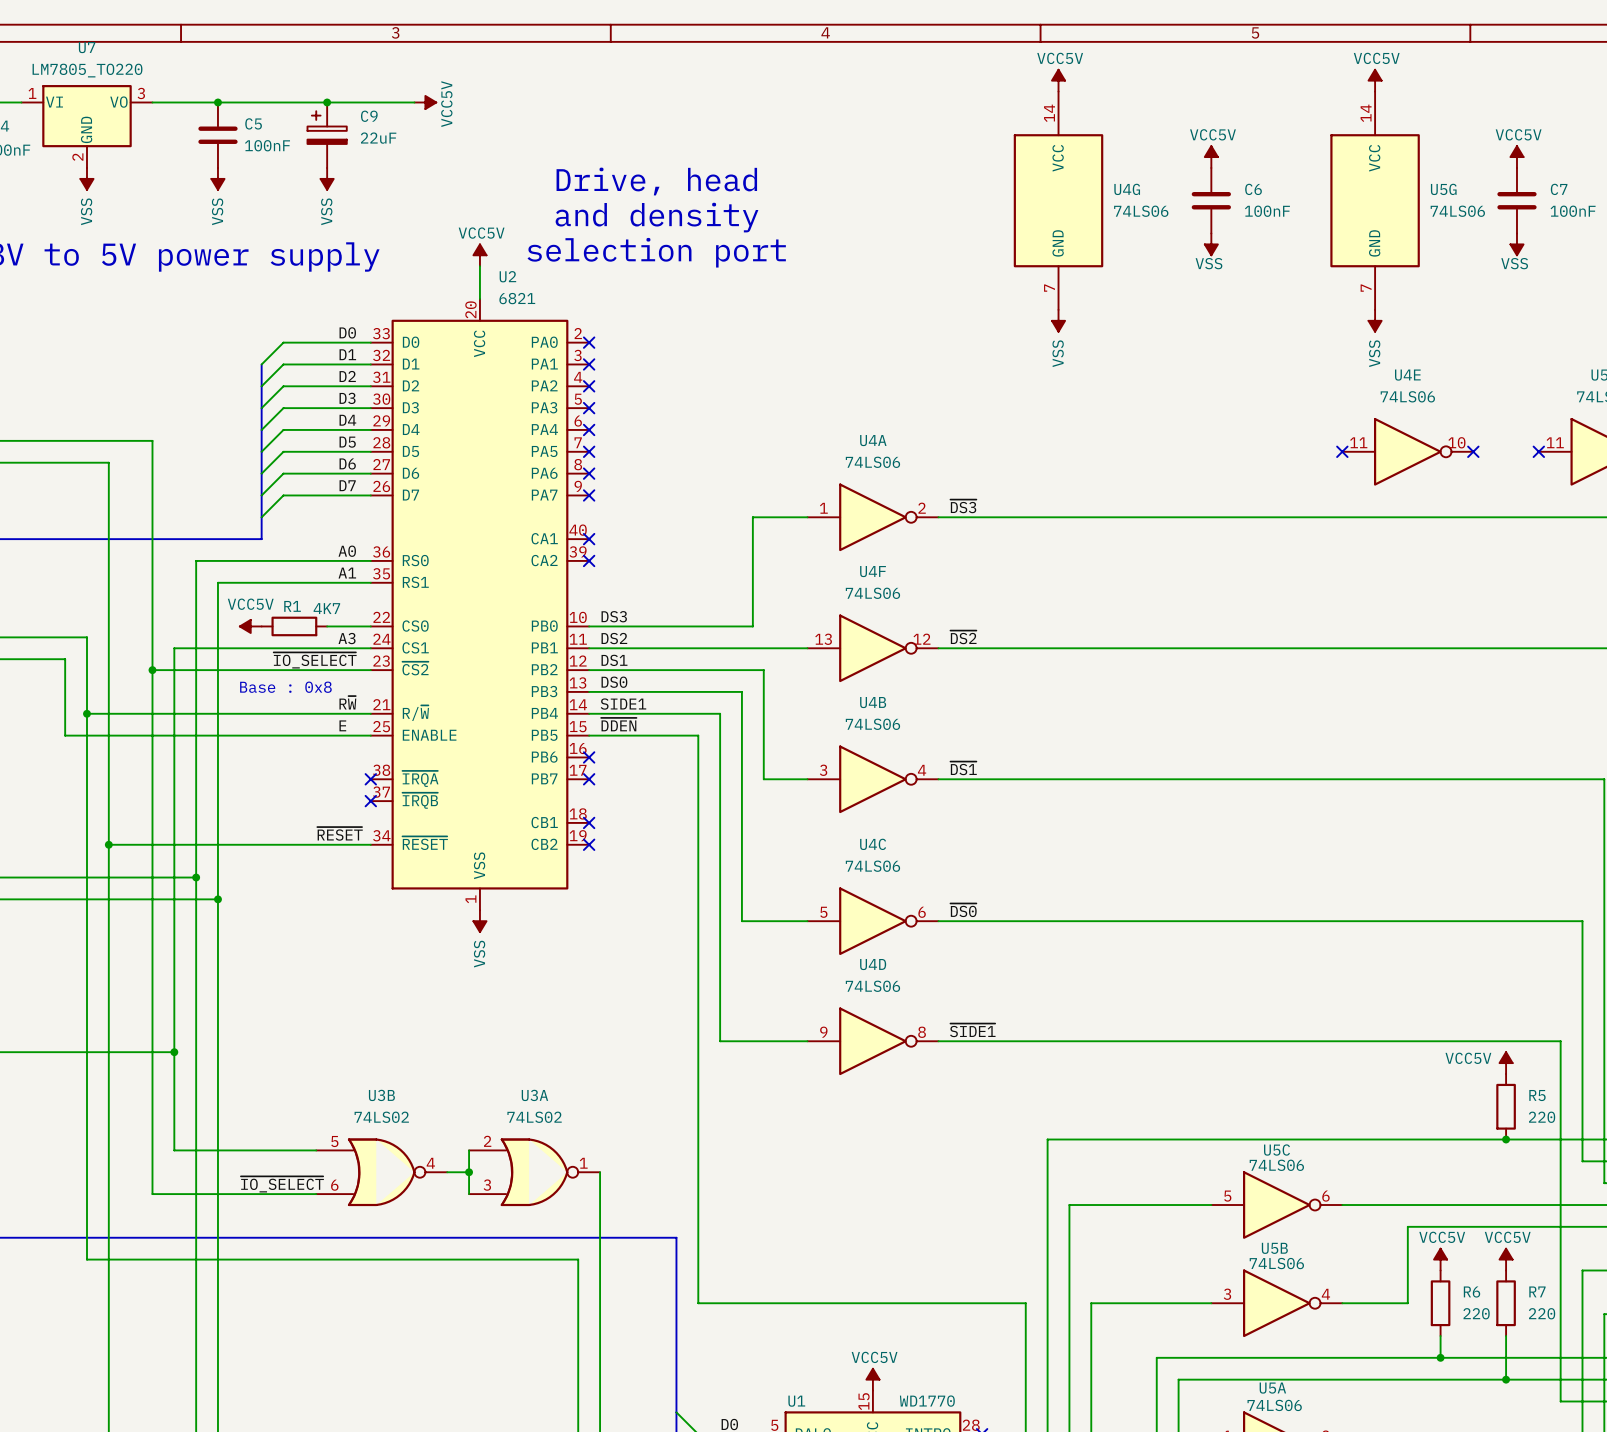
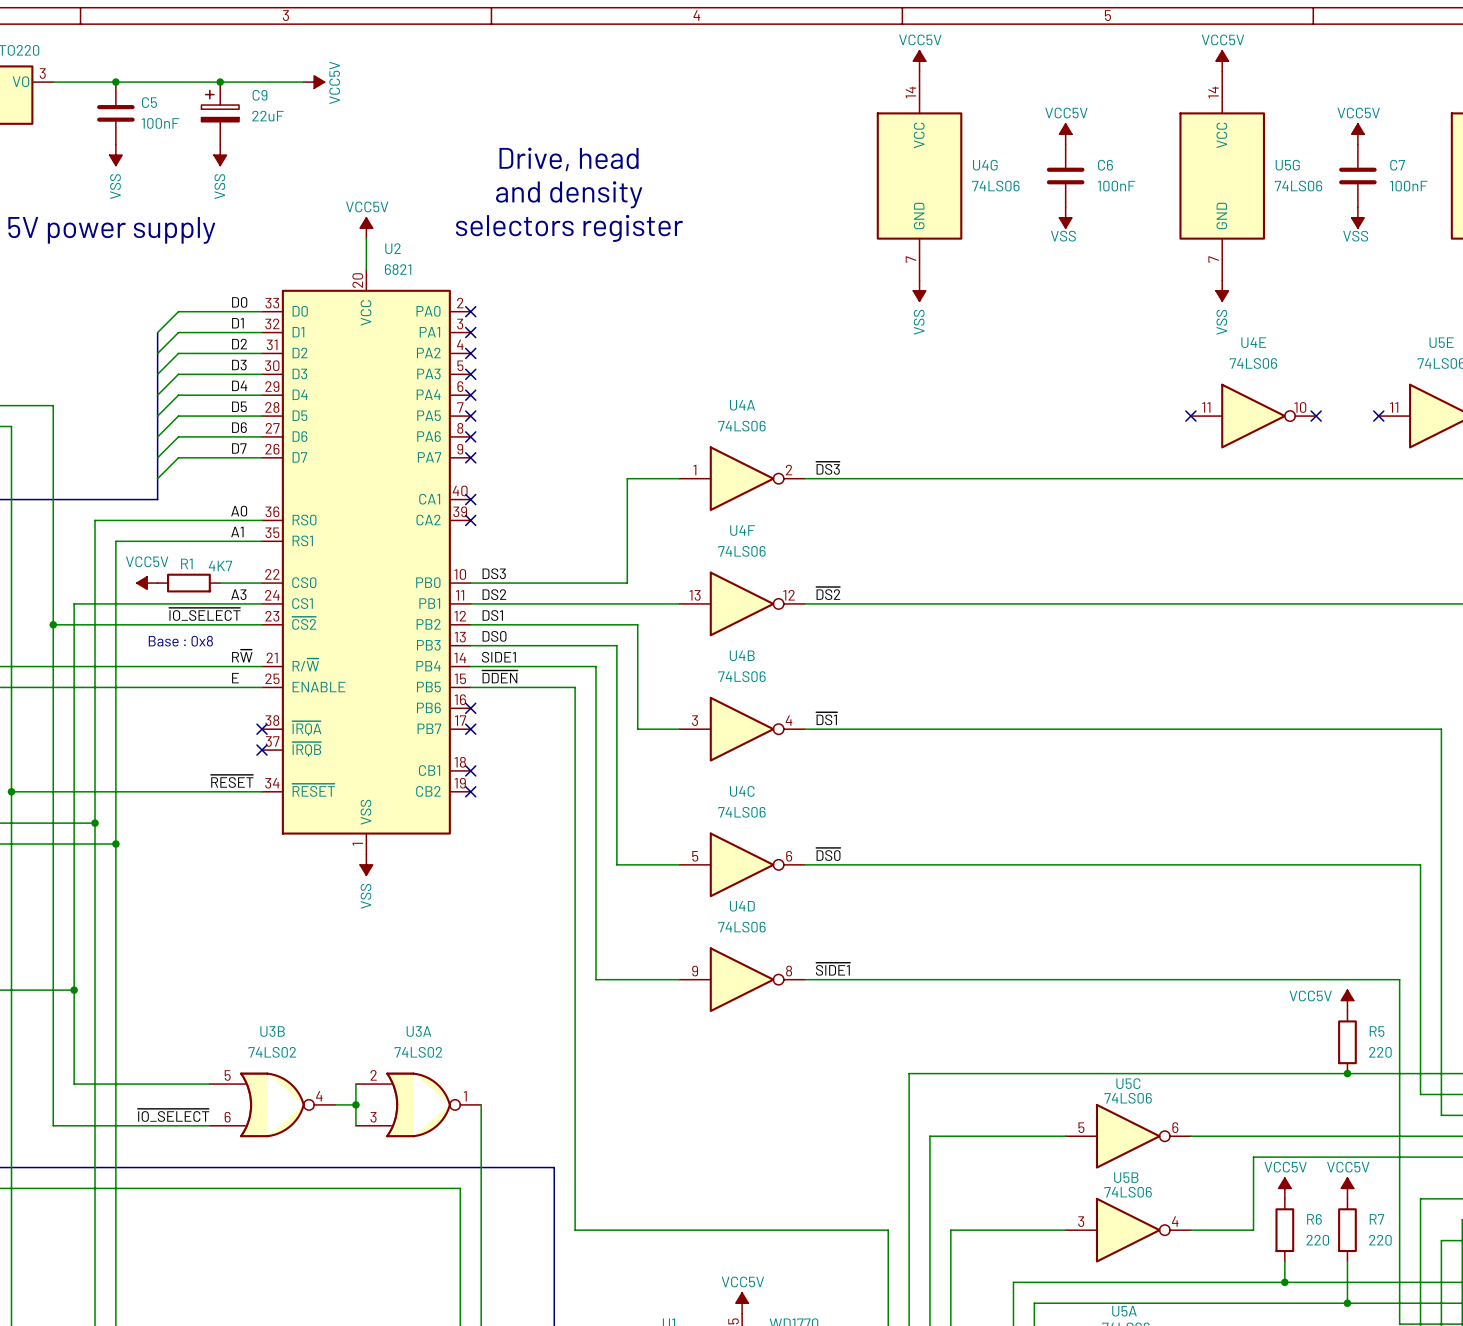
text position: Drive, head (656, 181) -> Drive, head (569, 159)
text position: and density (657, 217) -> and density (569, 194)
text: selection port (656, 252) -> none
text: none -> selectors register (569, 228)

